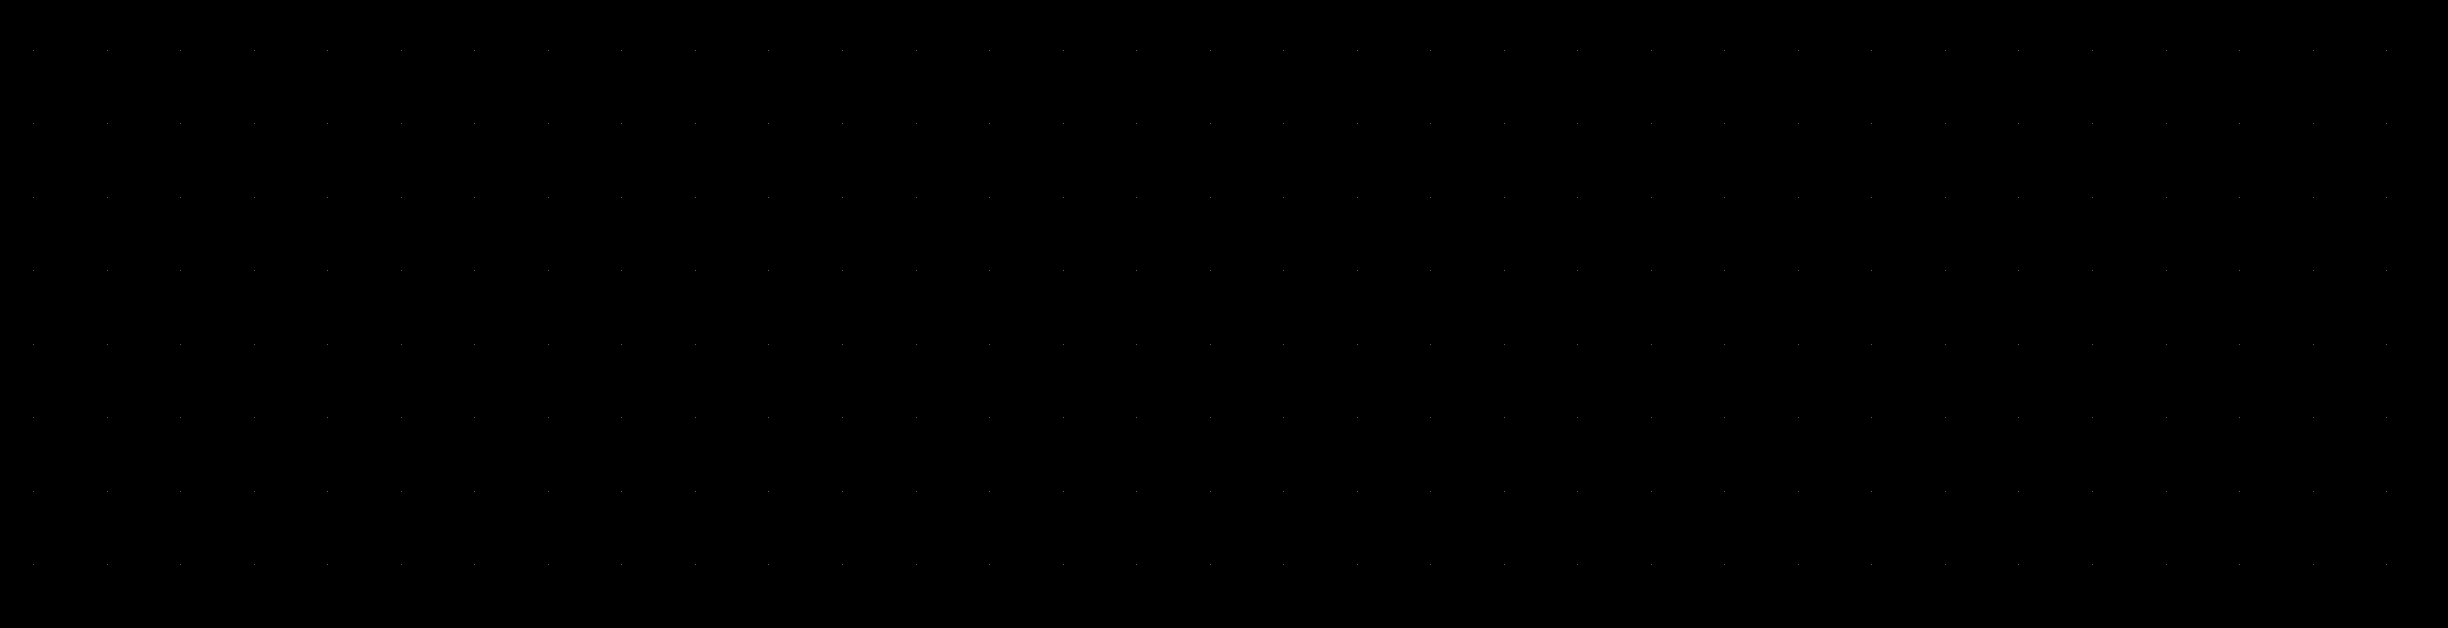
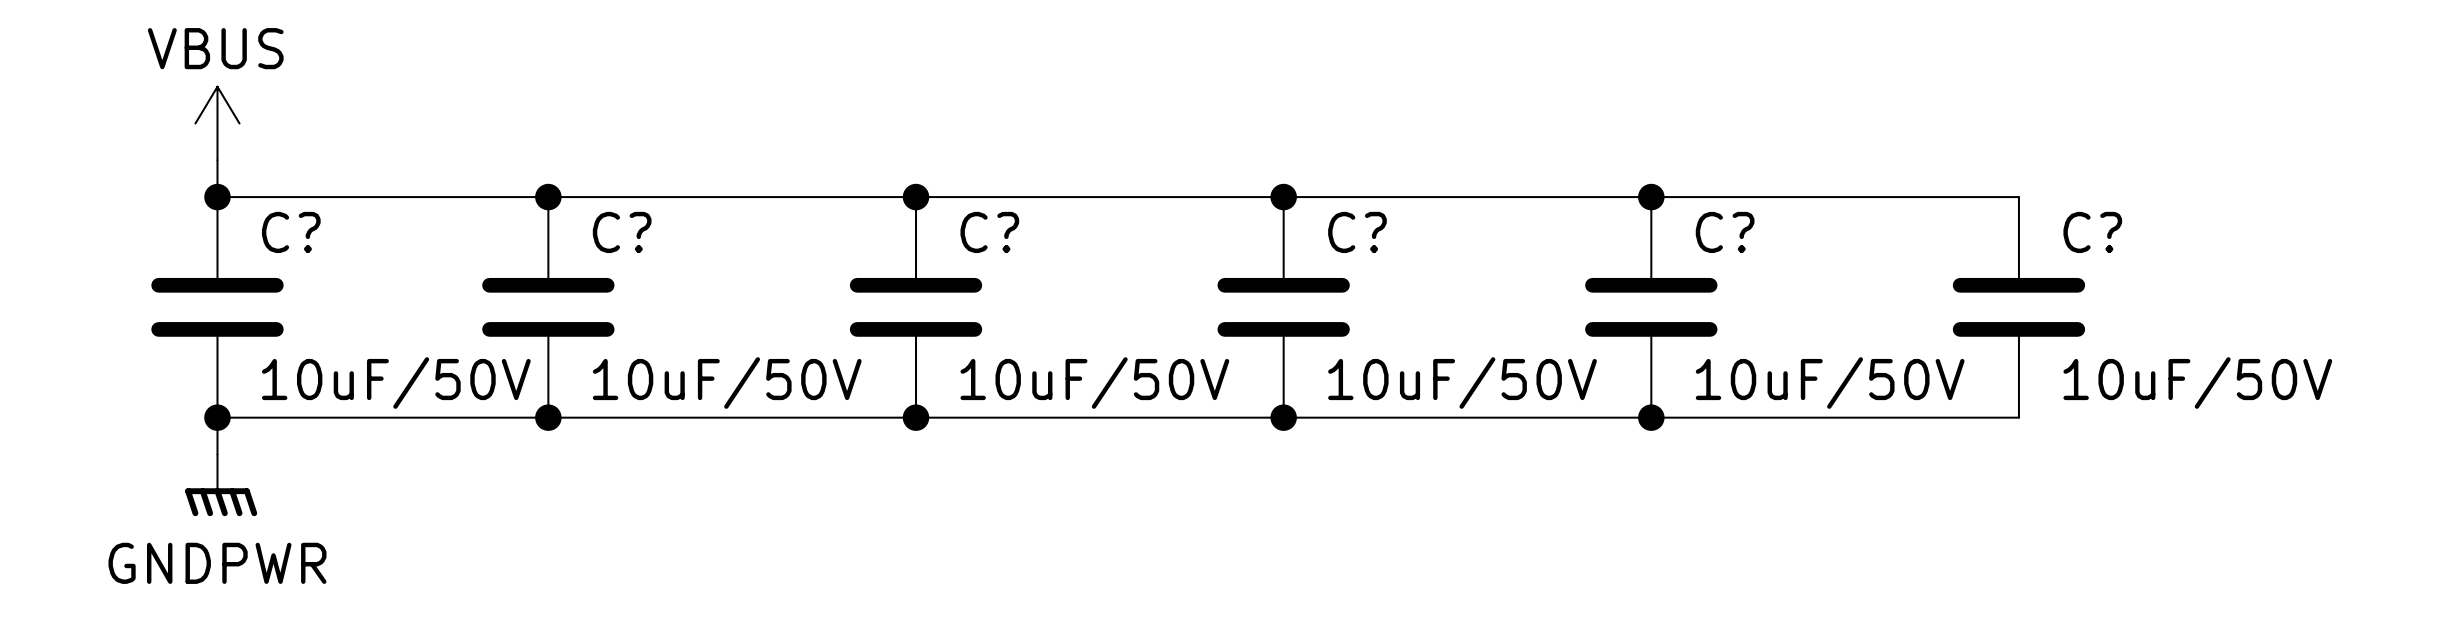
power symbol: none -> VBUS (217, 123)
wire: none -> (217, 160) (217, 197) (2018, 197)
junction: none -> (217, 197)
junction: none -> (548, 197)
junction: none -> (916, 197)
junction: none -> (1283, 197)
junction: none -> (1651, 197)
C?: none -> 10uF/50V (217, 307)
C?: none -> 10uF/50V (548, 307)
C?: none -> 10uF/50V (916, 307)
C?: none -> 10uF/50V (1283, 307)
C?: none -> 10uF/50V (1651, 307)
C?: none -> 10uF/50V (2018, 307)
junction: none -> (217, 417)
junction: none -> (548, 417)
junction: none -> (916, 417)
junction: none -> (1283, 417)
junction: none -> (1651, 417)
wire: none -> (2018, 417) (217, 417) (217, 454)
power symbol: none -> GNDPWR (221, 485)

